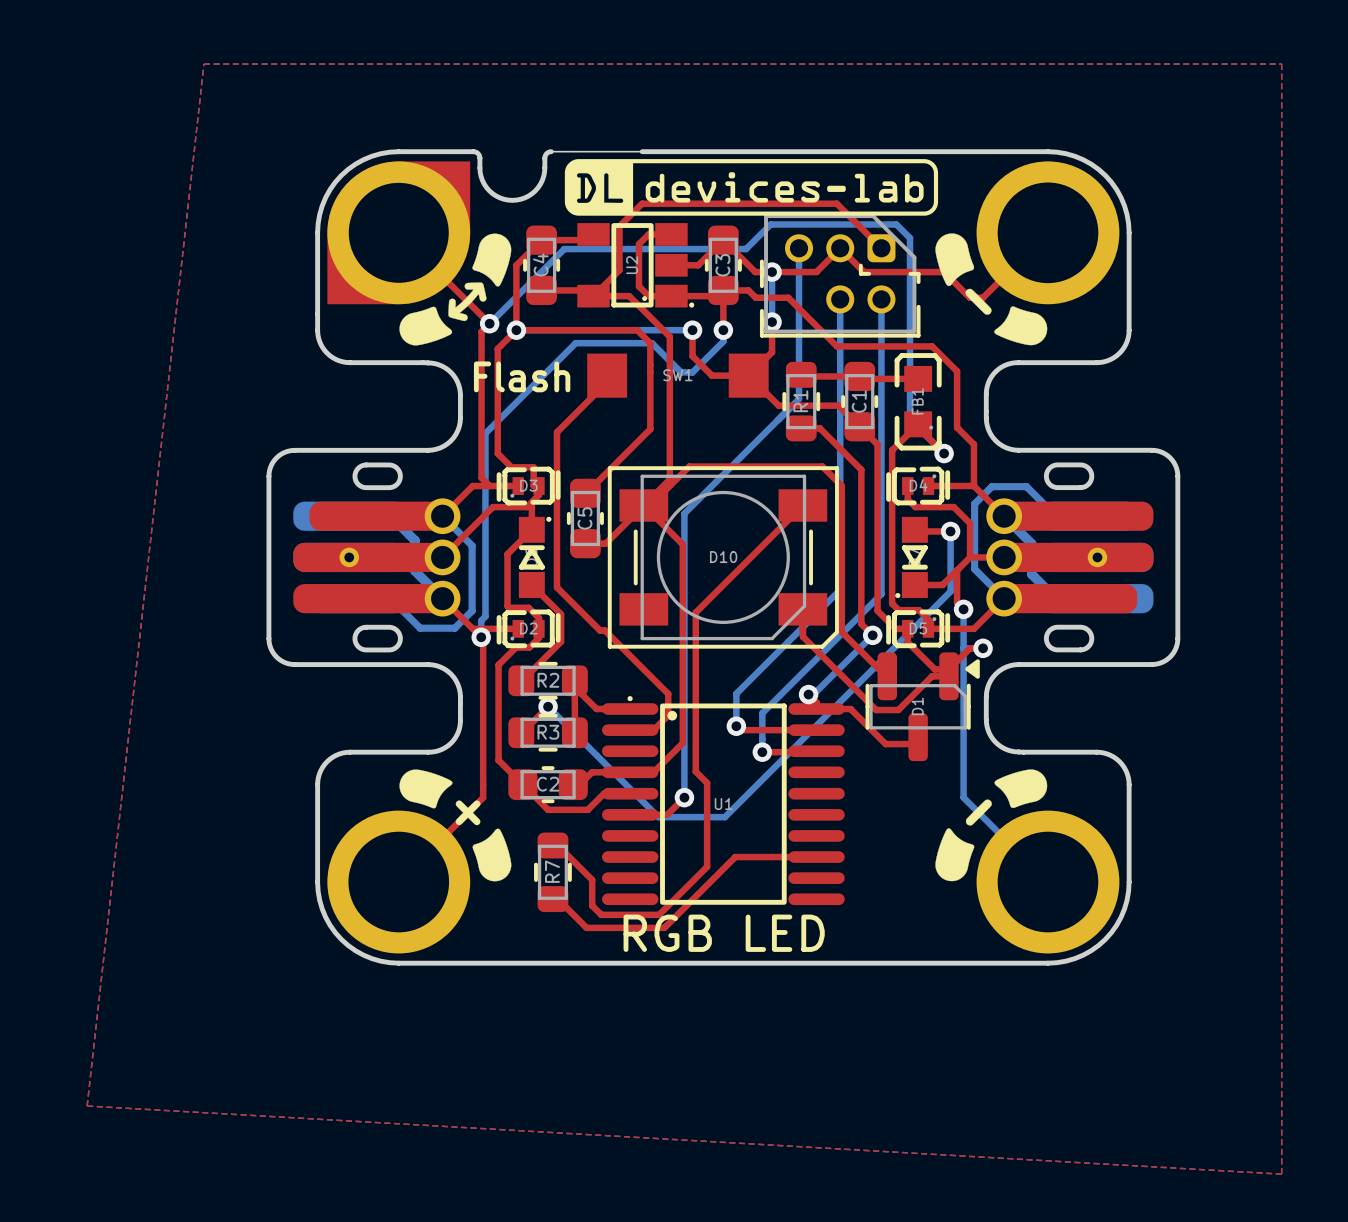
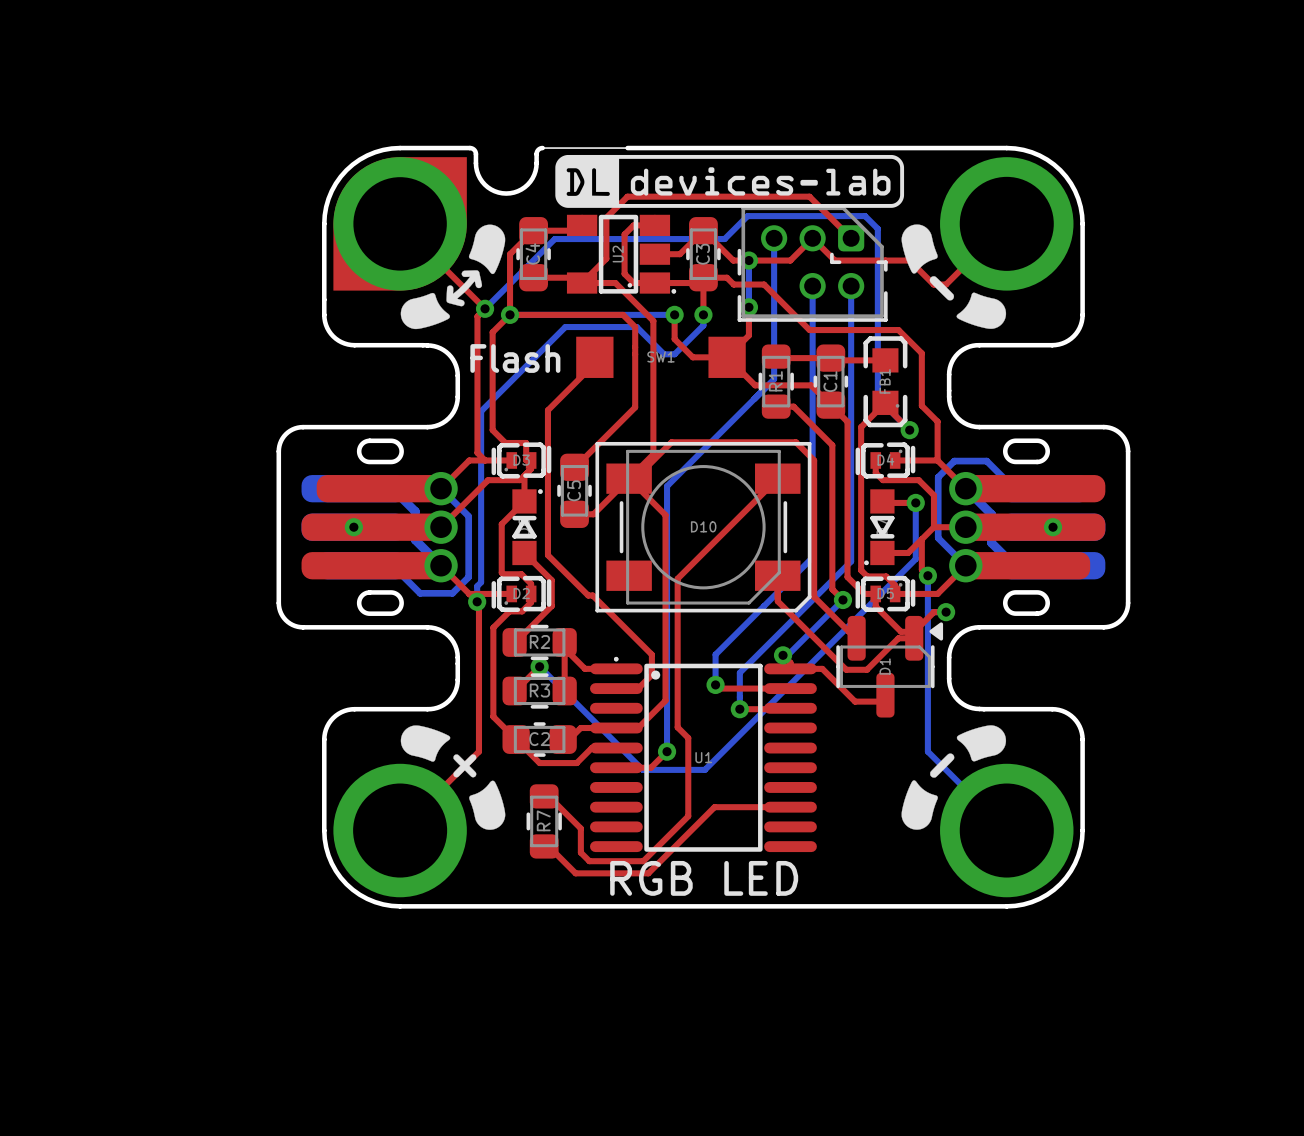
top zone outline: (204, 64) (1281, 64) (1281, 1174) (87, 1106) (204, 64) -> none

